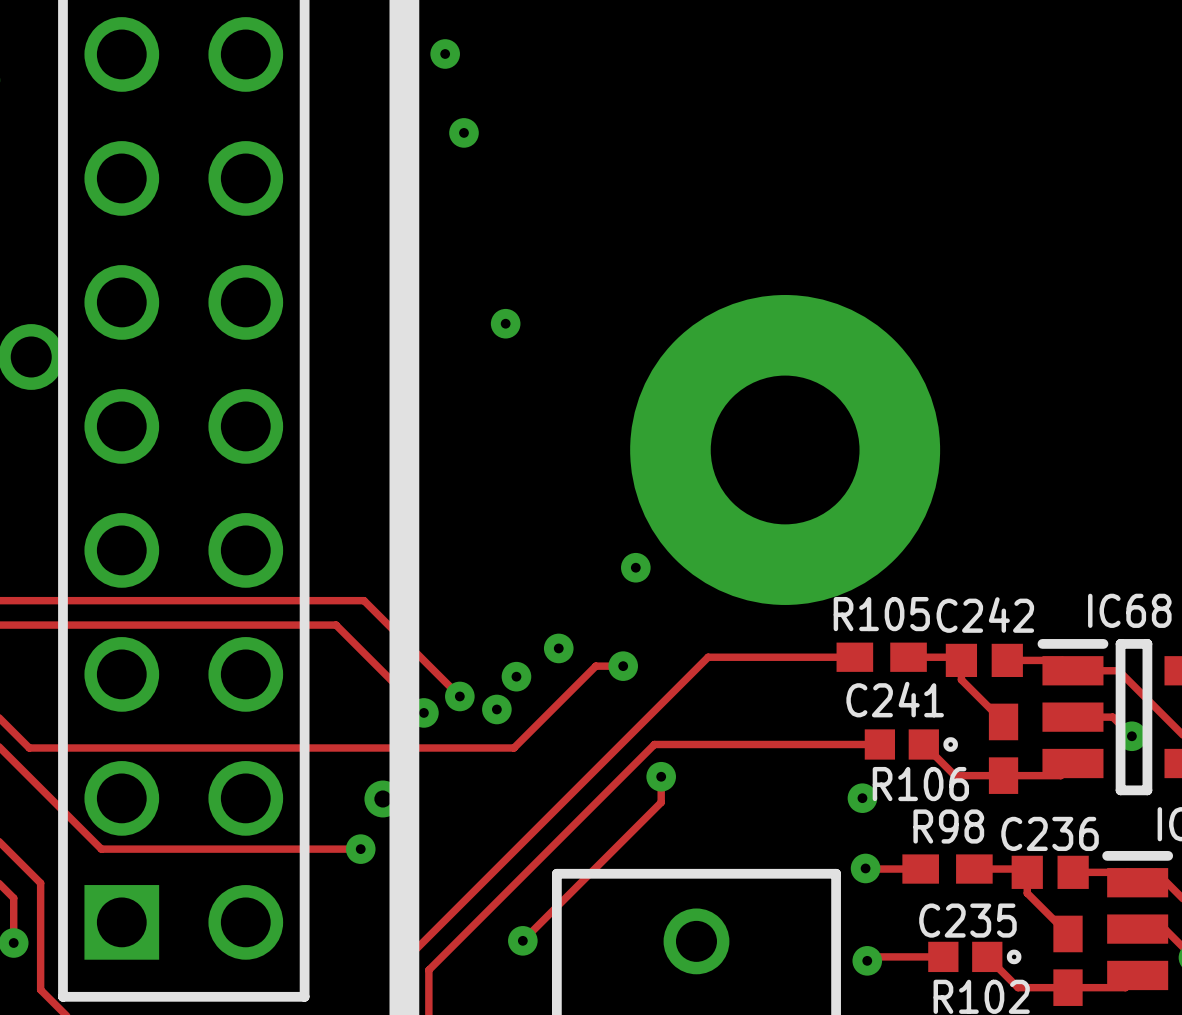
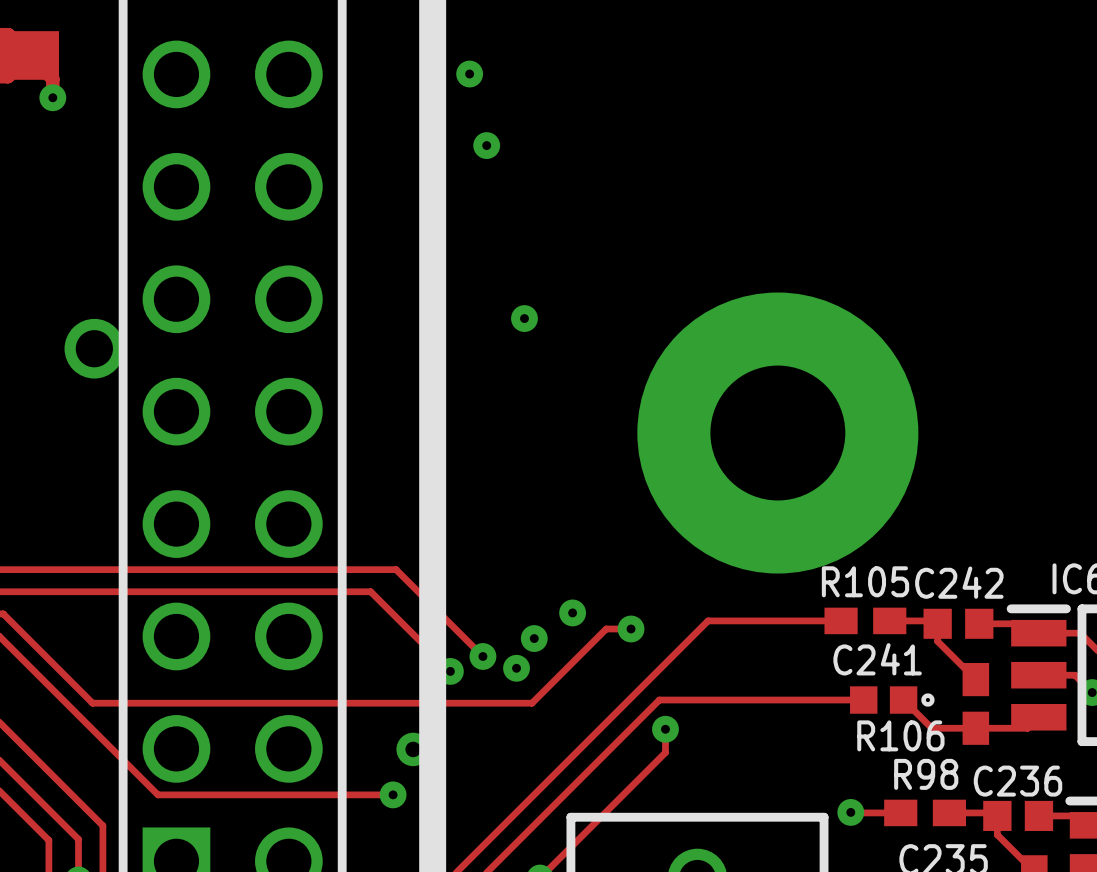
via: (635, 567) -> none
via: (862, 798) -> none

